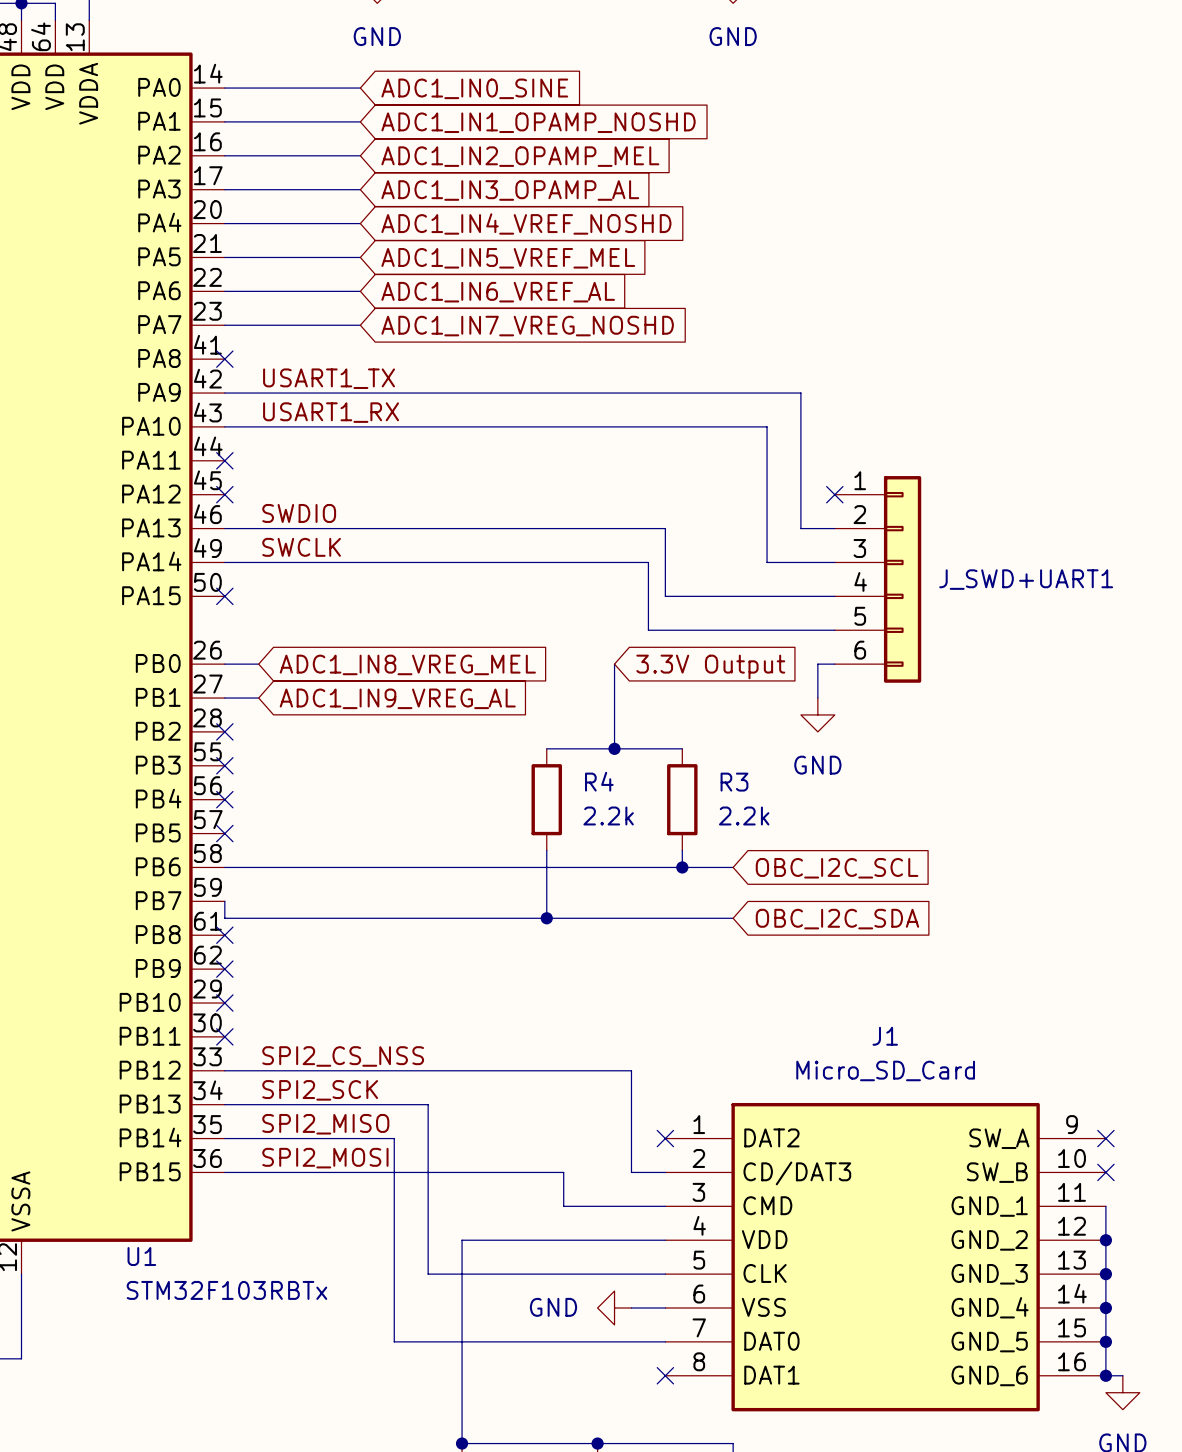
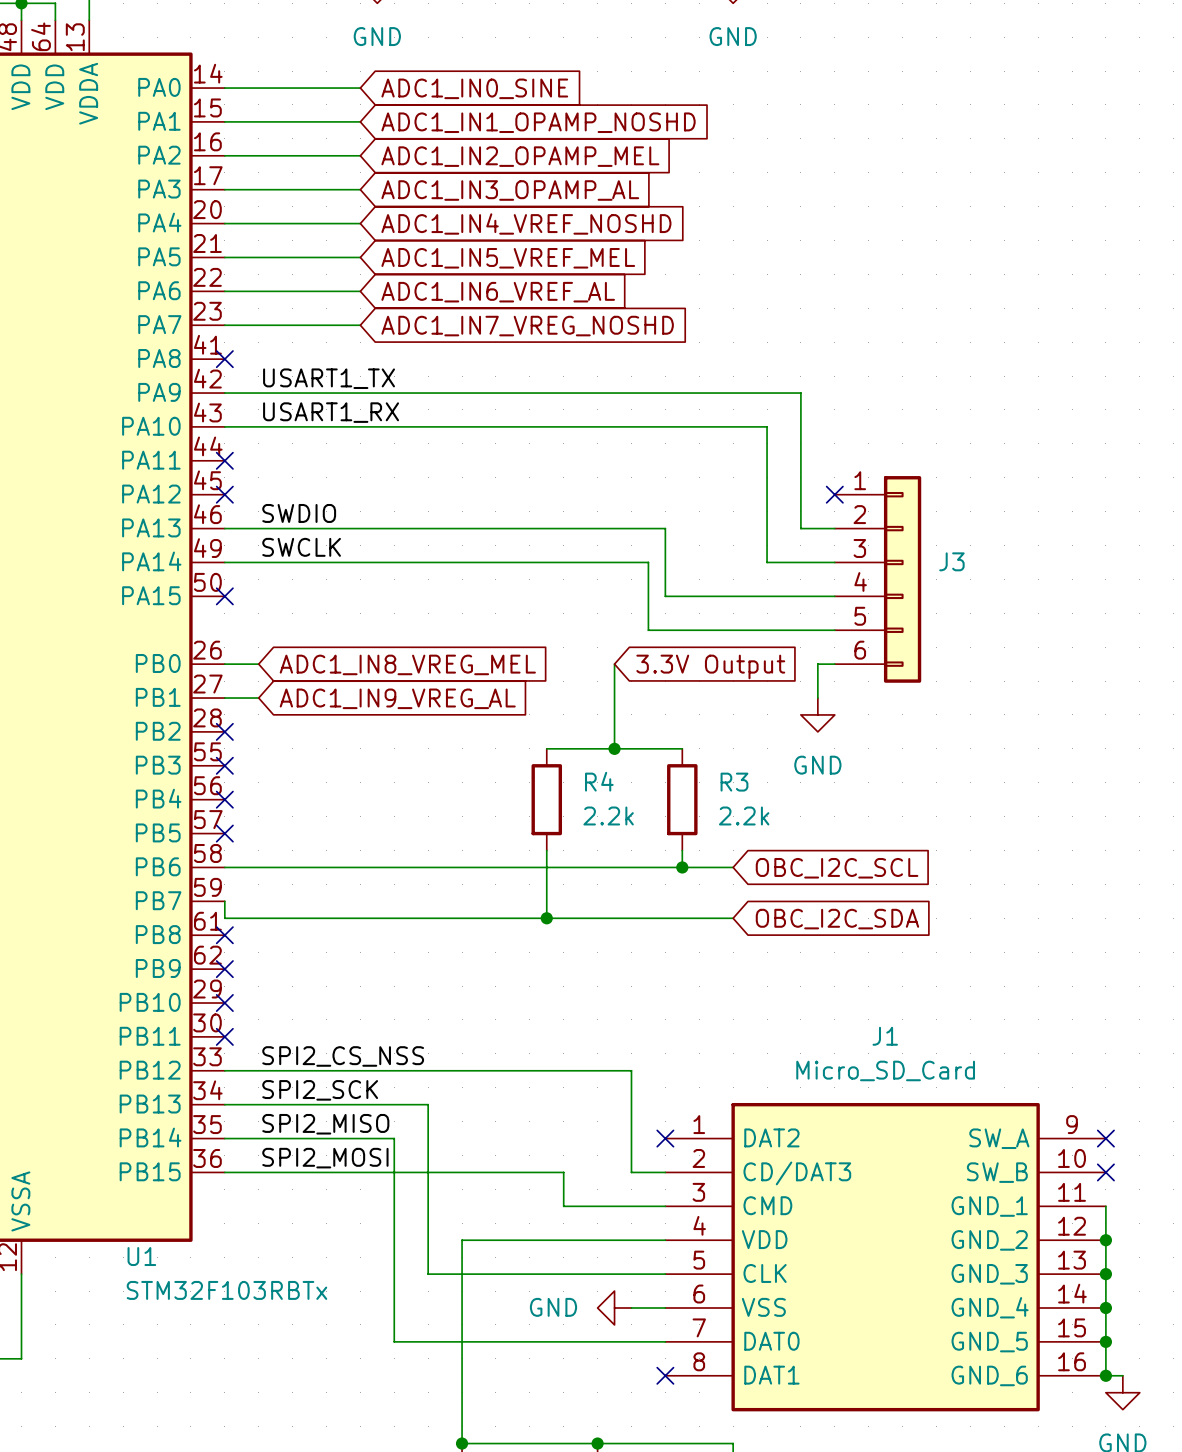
J_SWD+UART1 name: J_SWD+UART1 (1026, 579) -> J3 (951, 561)

